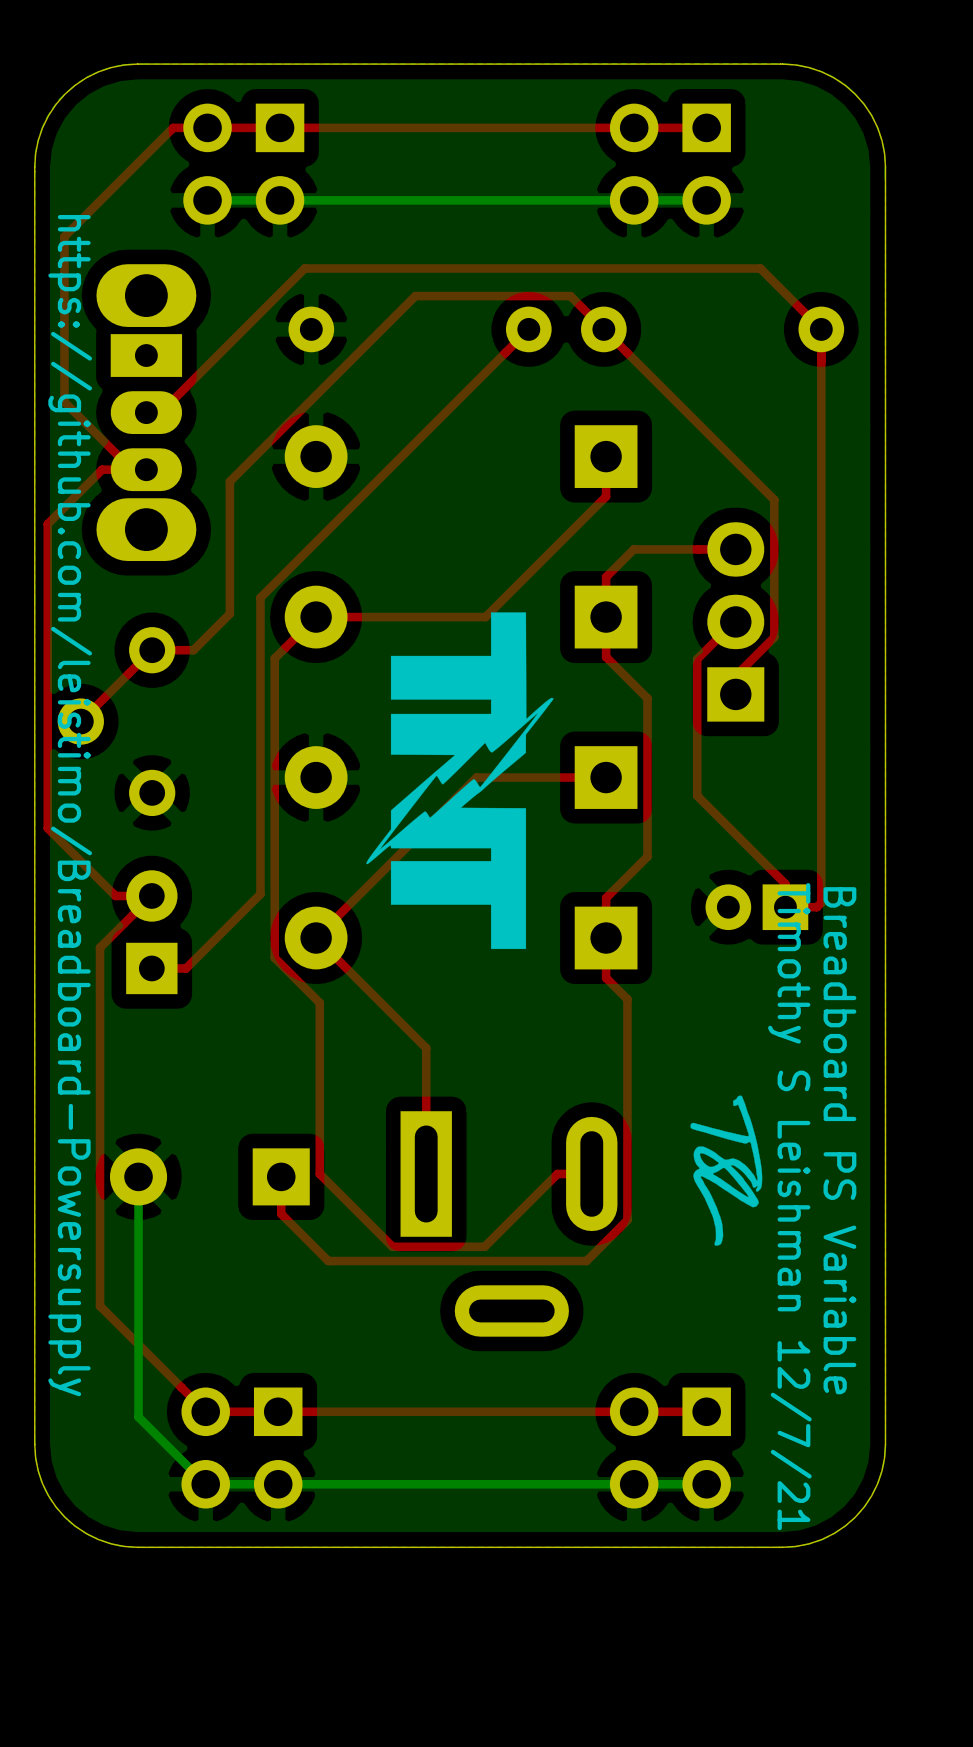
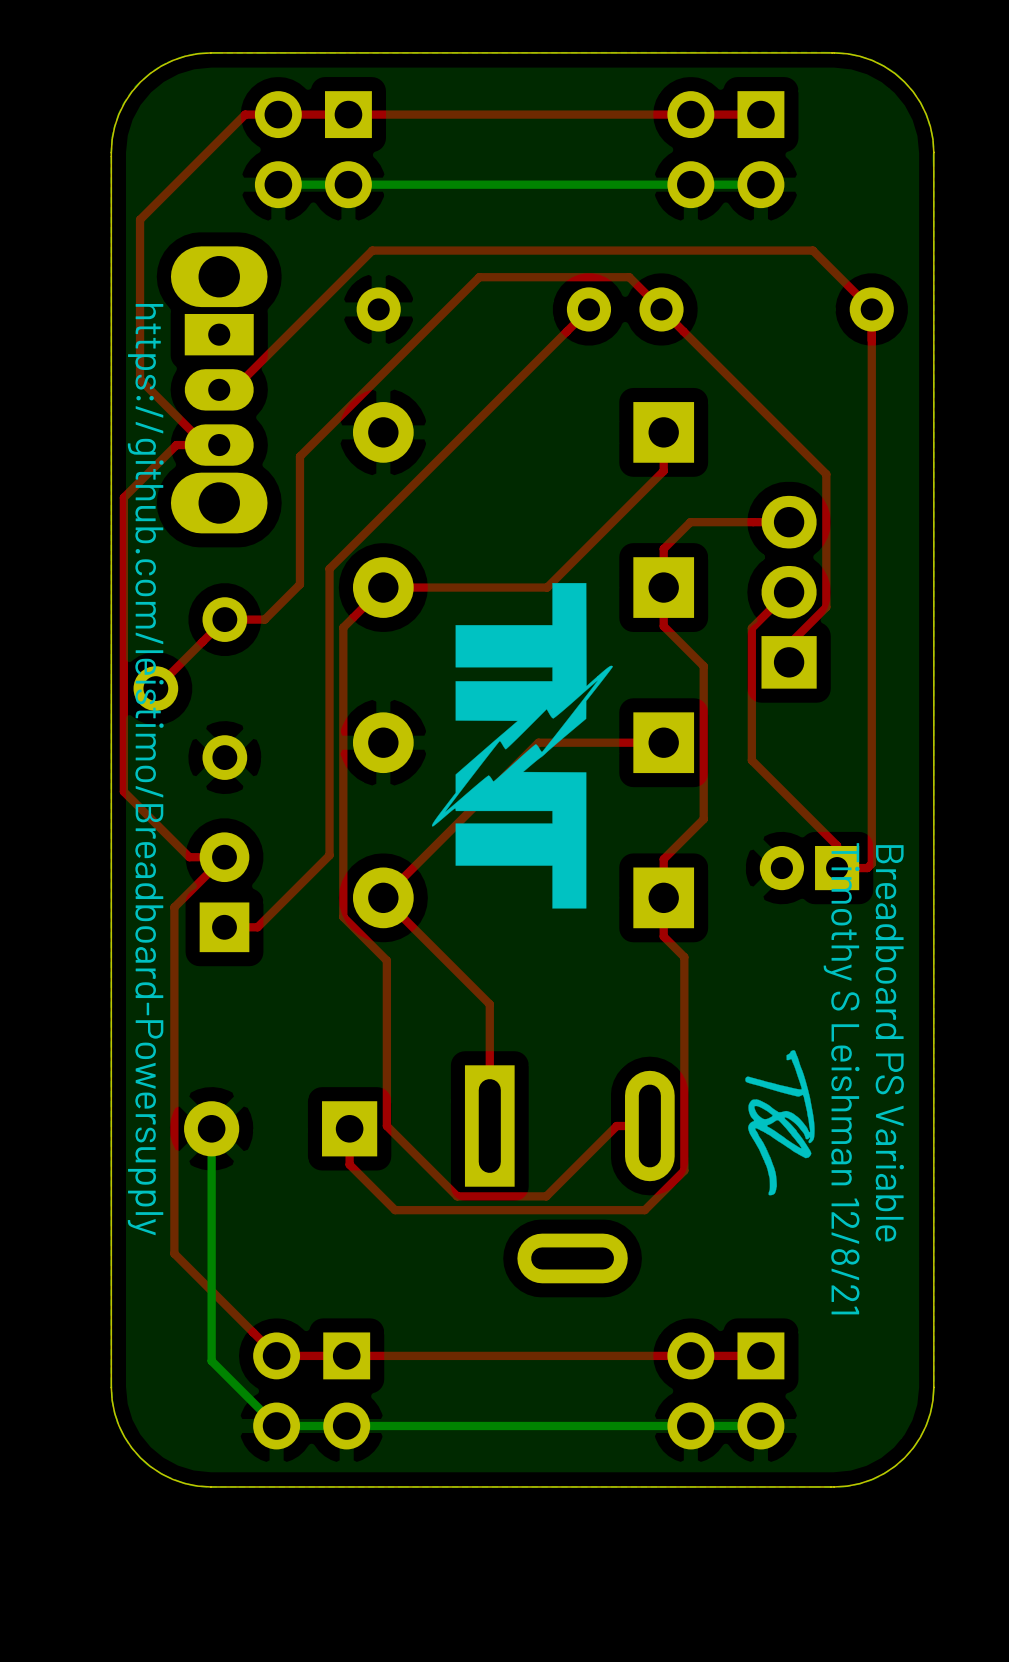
text: Timothy S Leishman 12/7/21 (789, 1206) -> Timothy S Leishman 12/8/21 (841, 1078)

